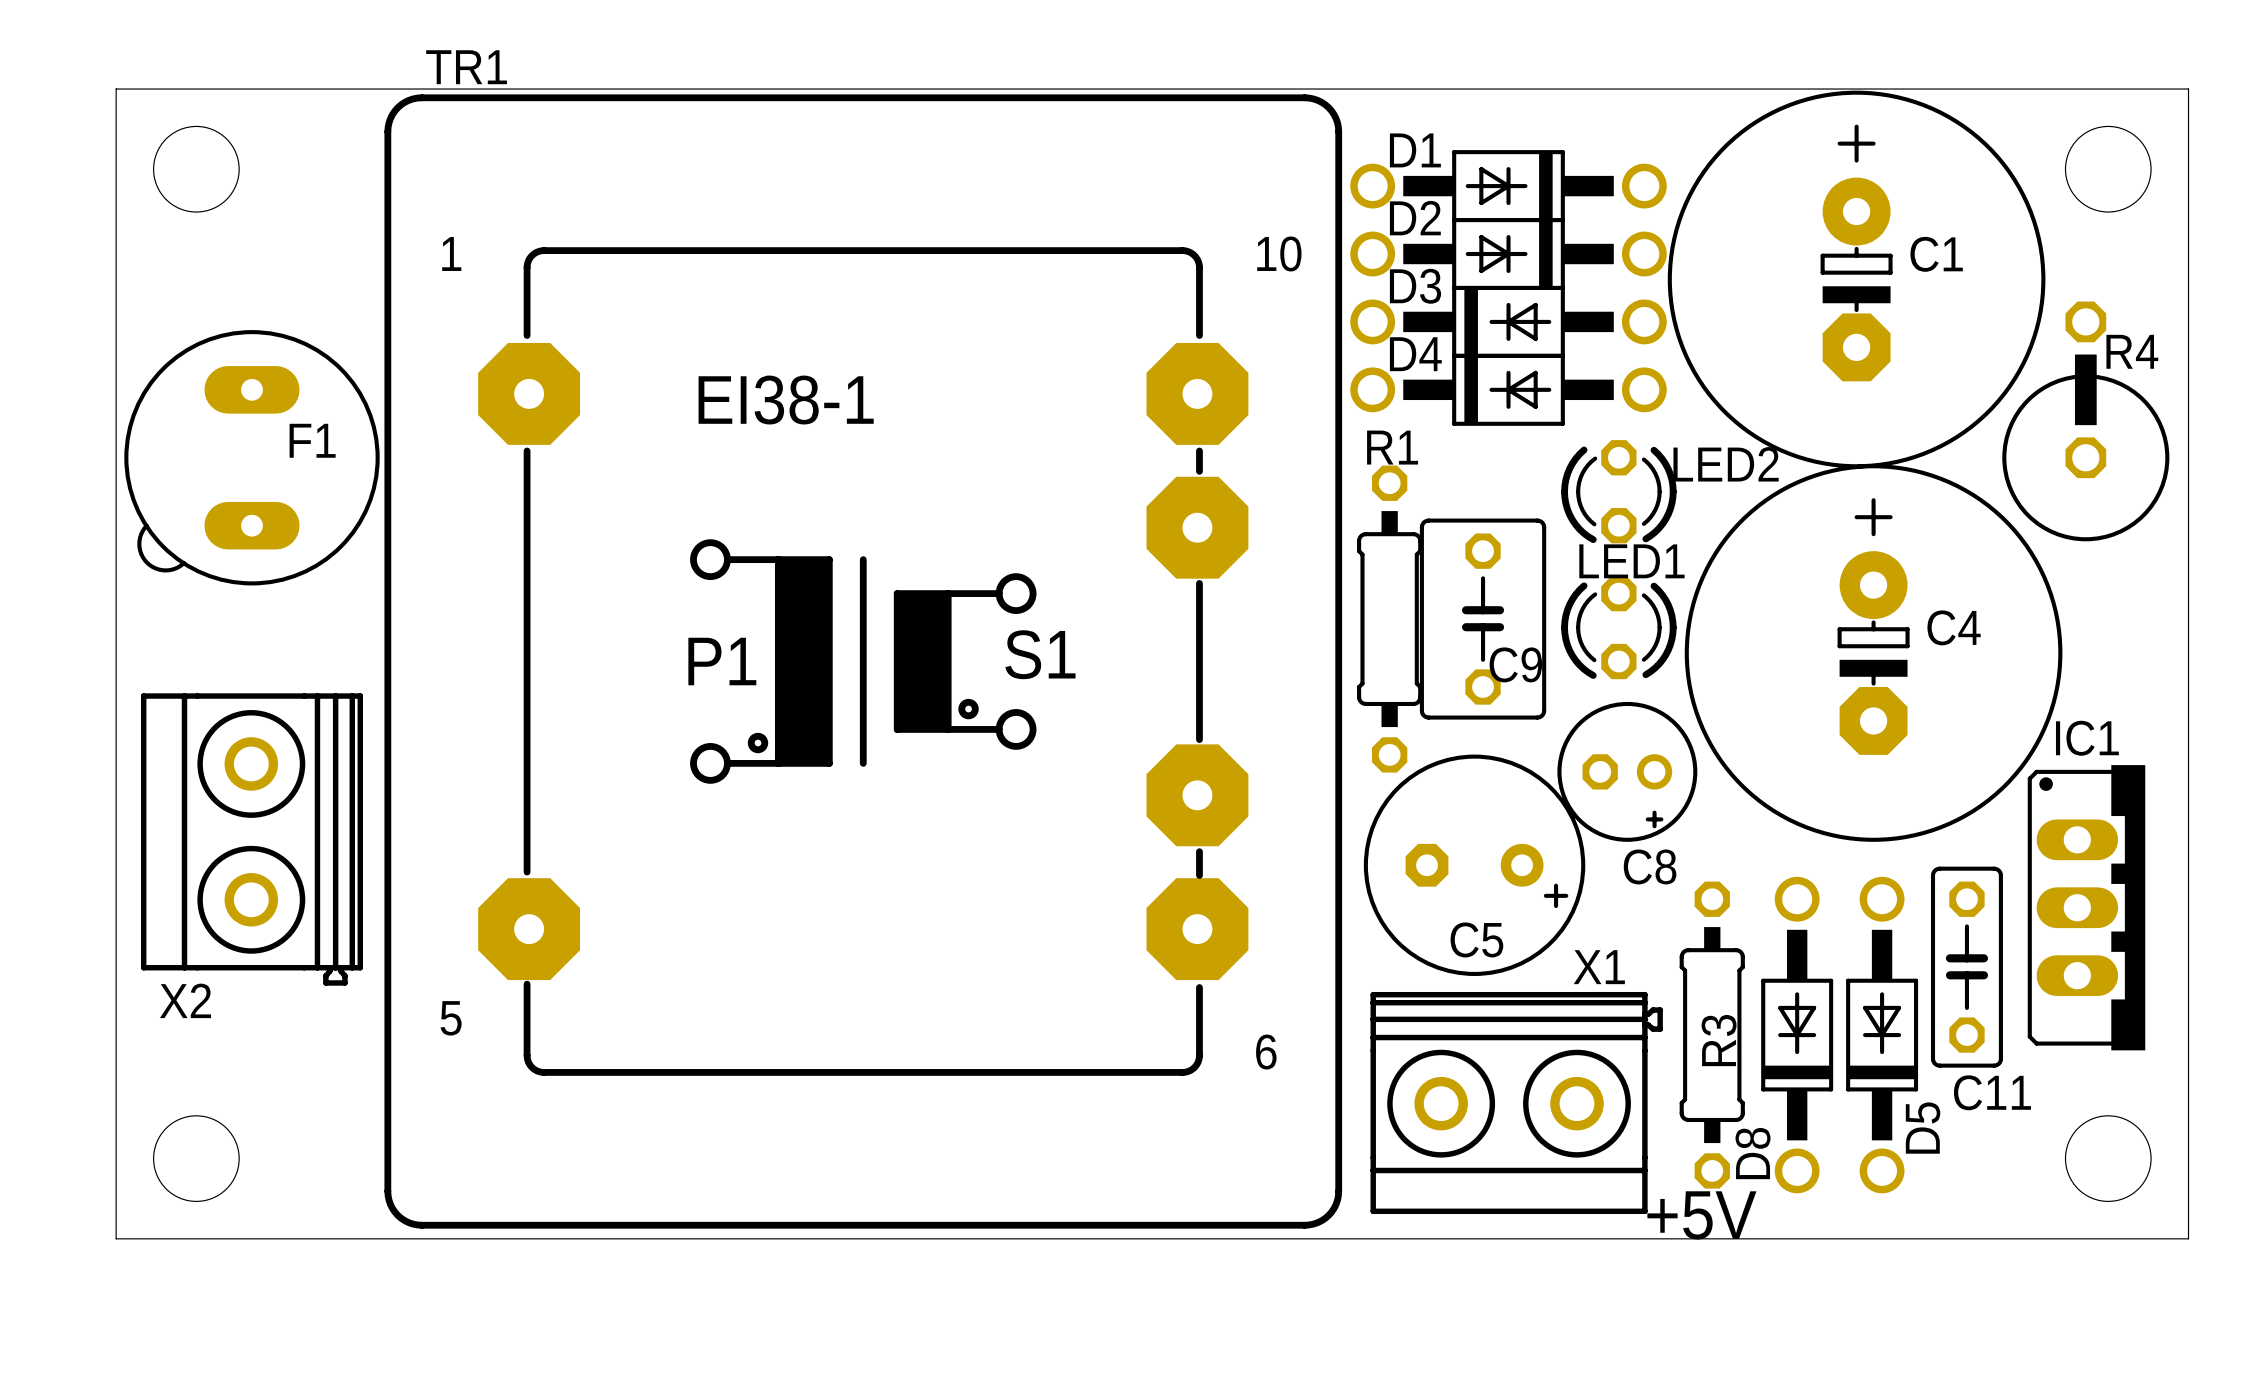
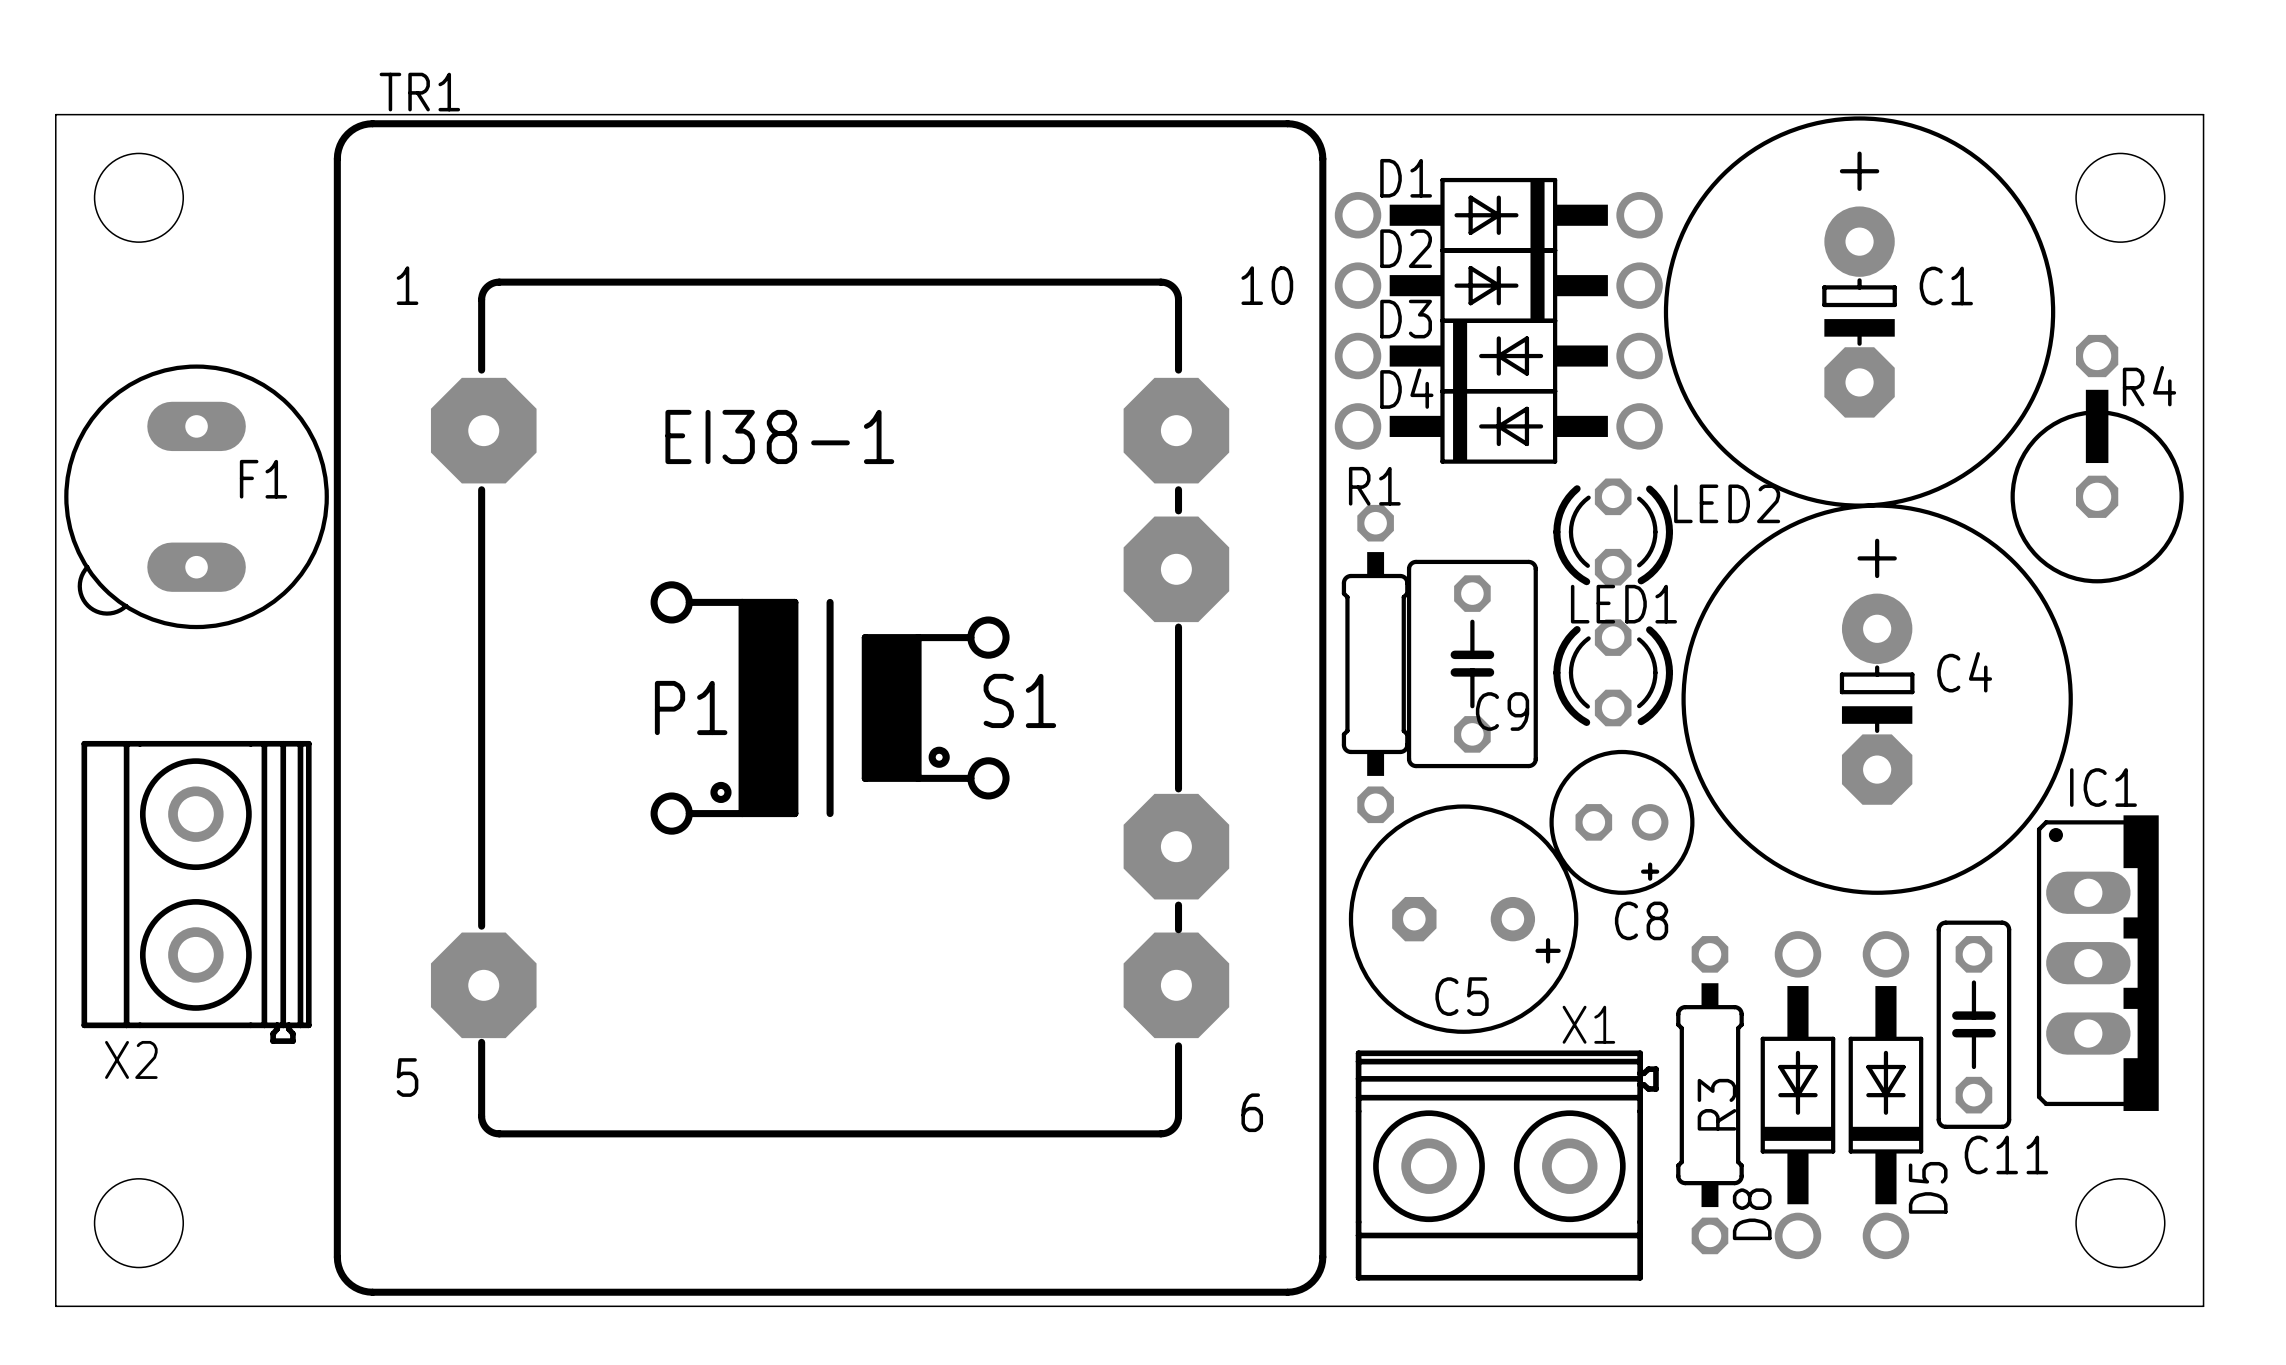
text: +5V (1701, 1215) -> none

